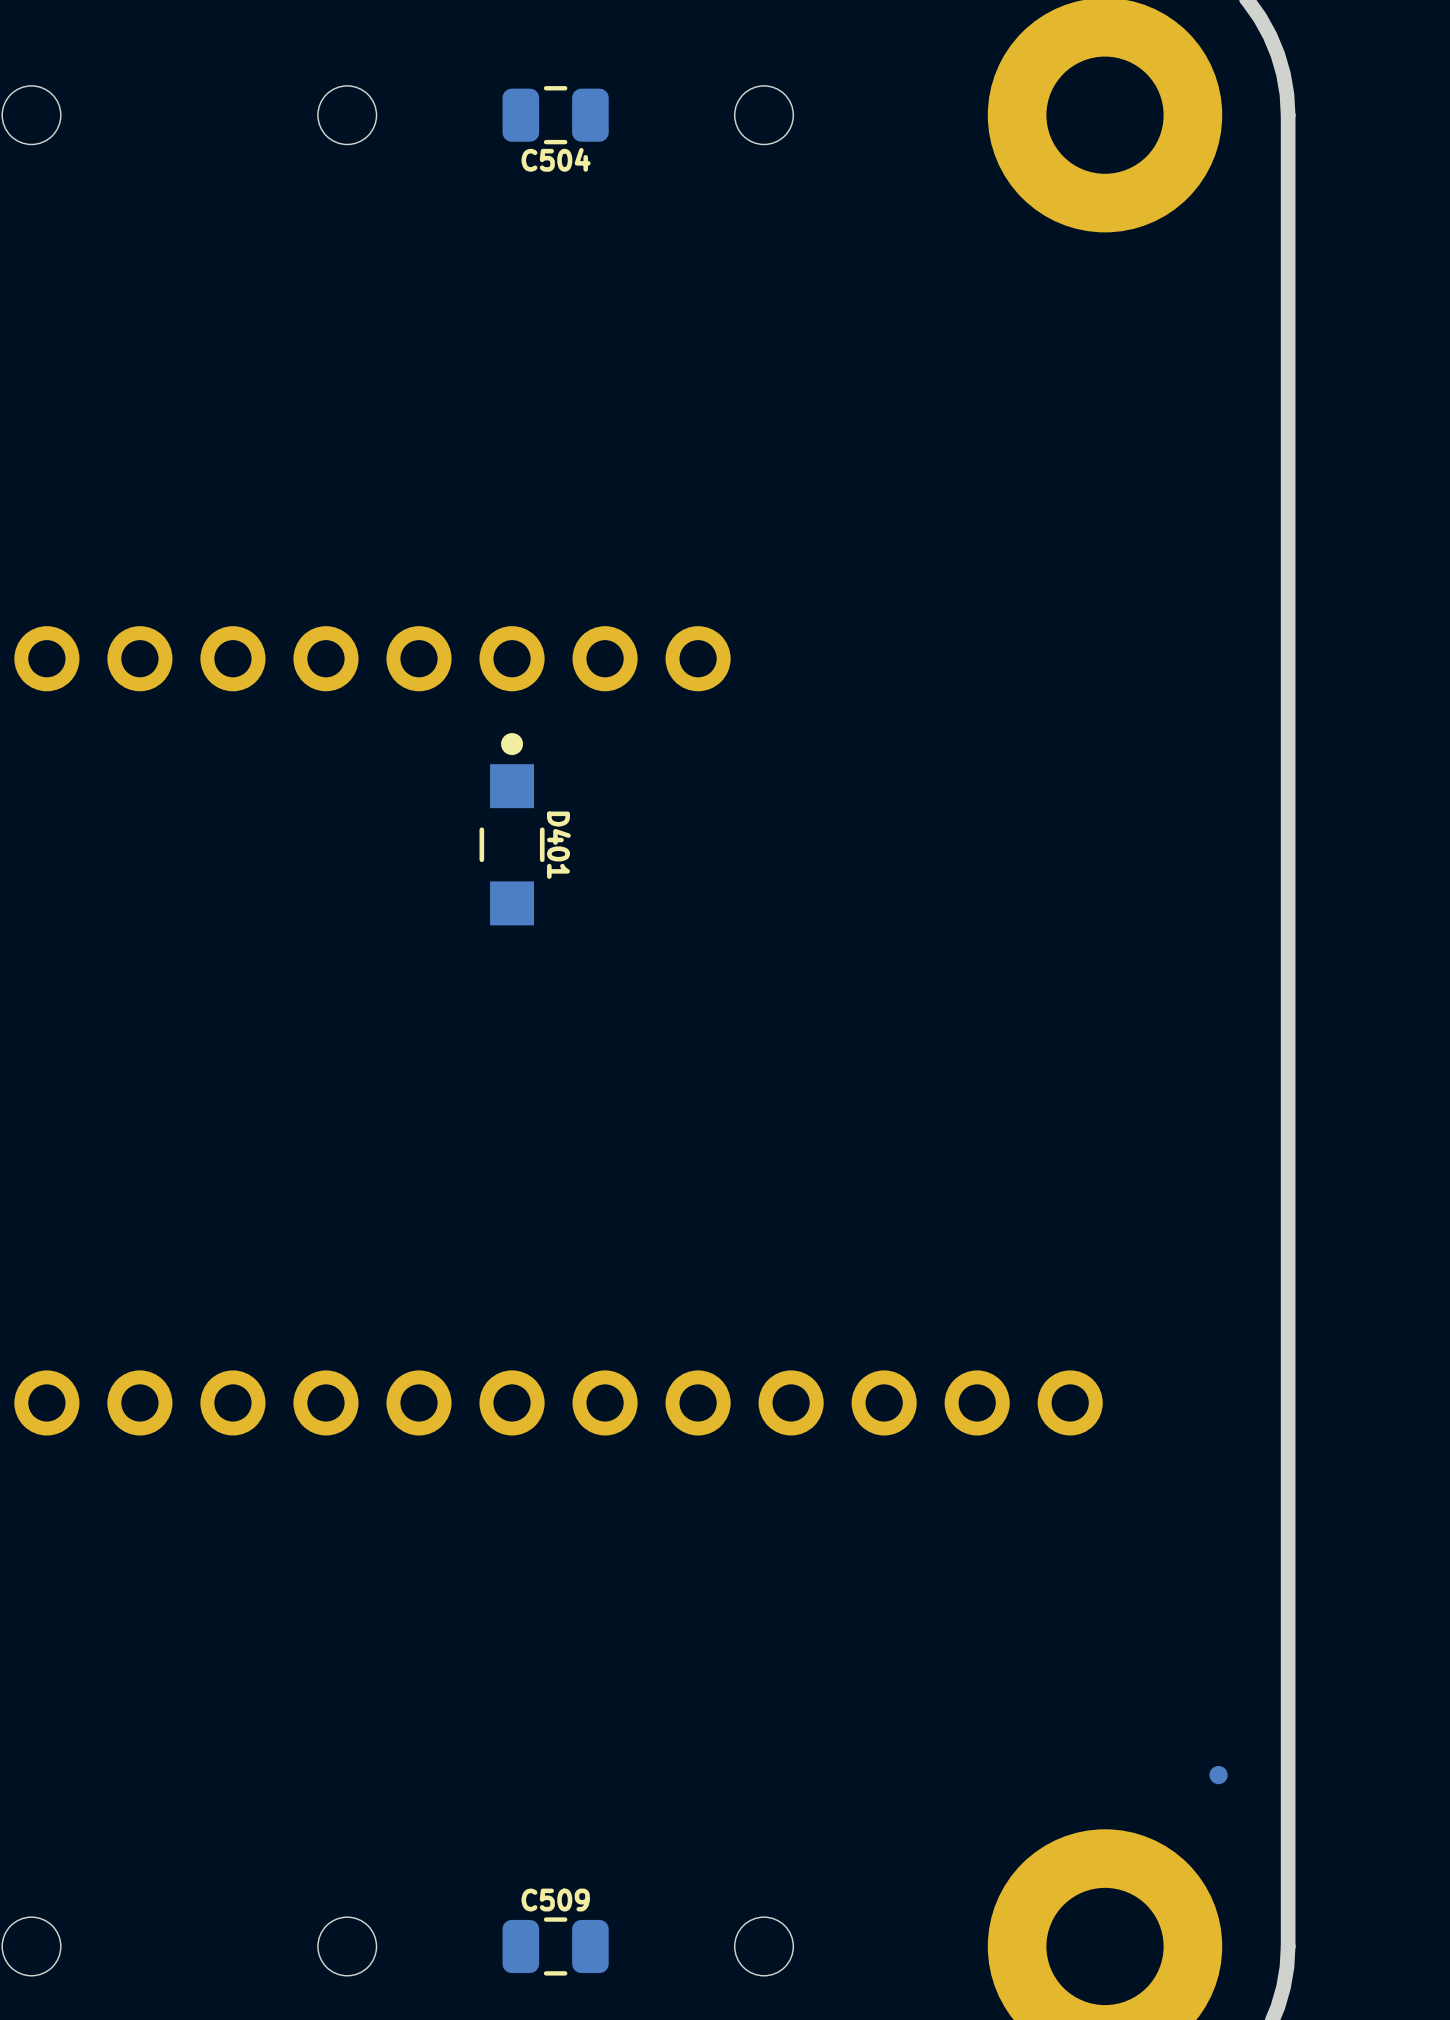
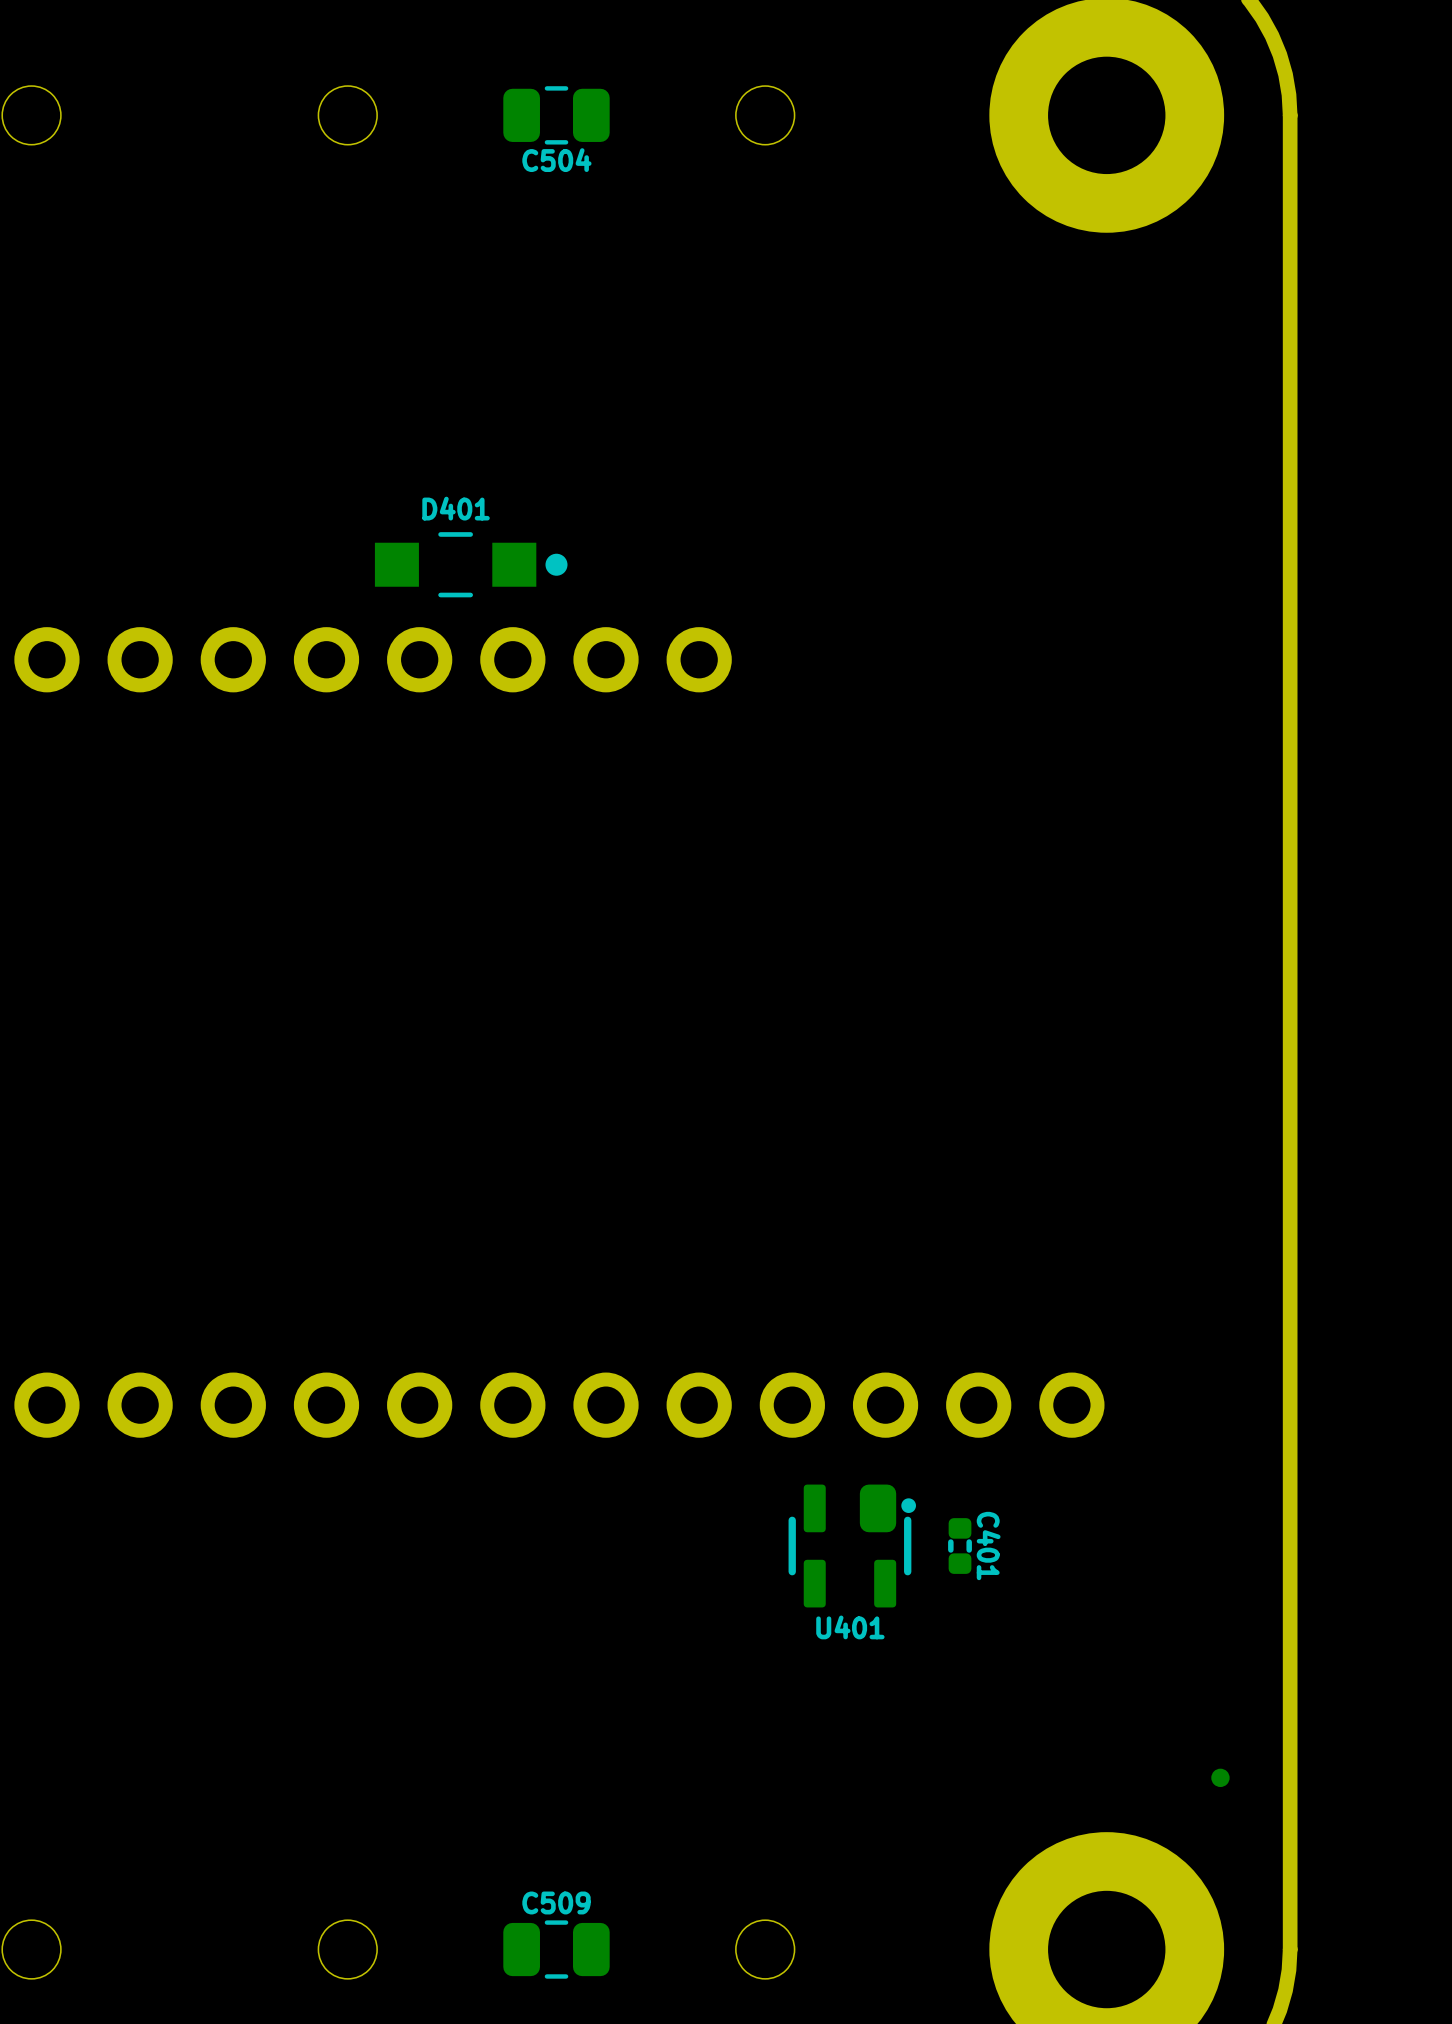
D401 rotation: 0° (512, 829) -> 90° clockwise (471, 564)
D401 position: (512, 829) -> (471, 564)
D401 name position: D401 (558, 845) -> D401 (456, 508)
U401: none -> (852, 1546)
C401: none -> (960, 1546)

